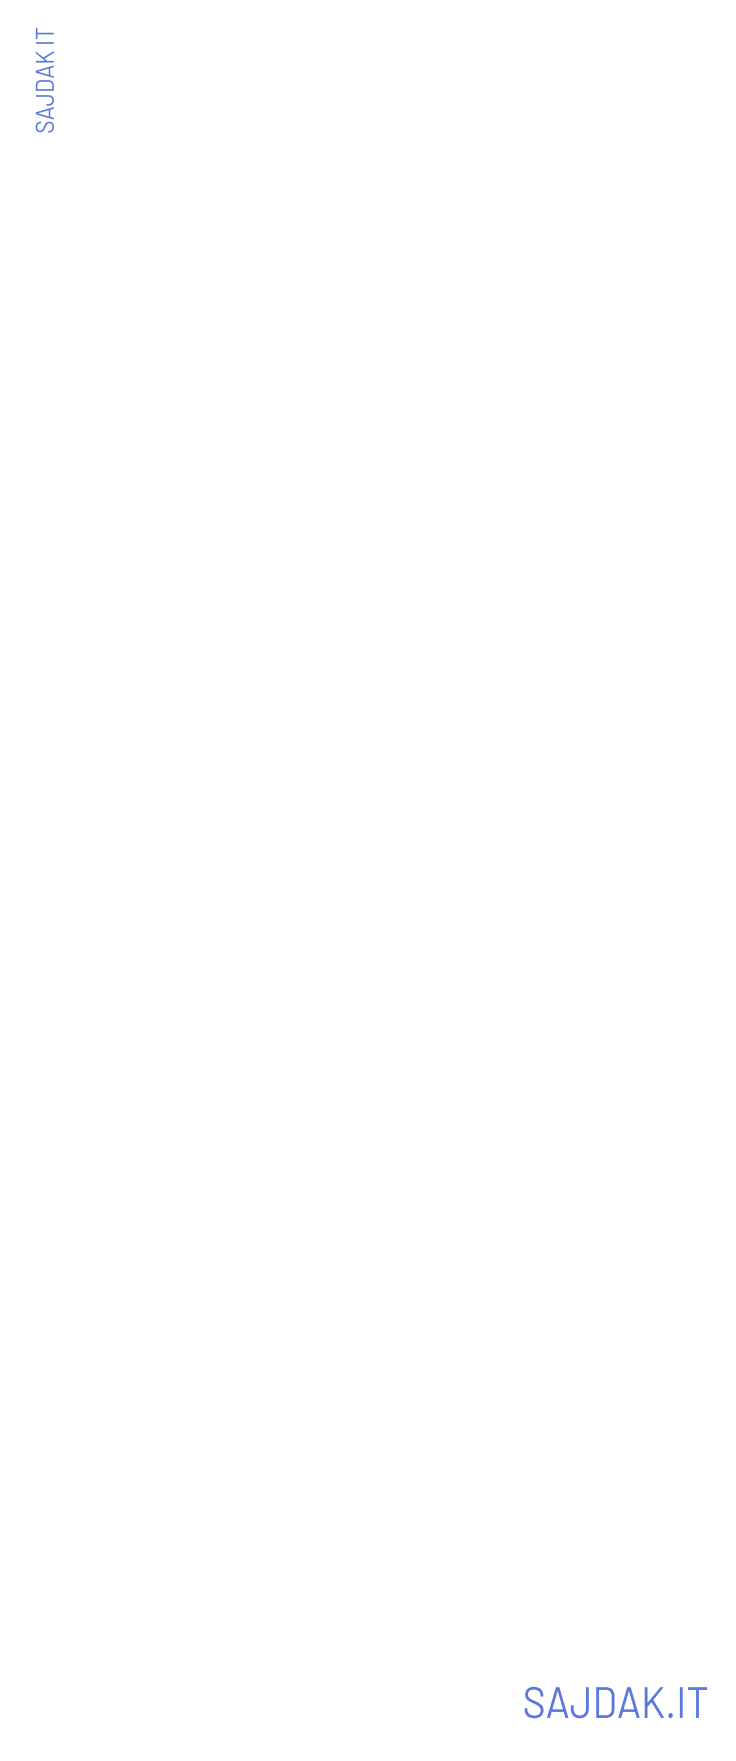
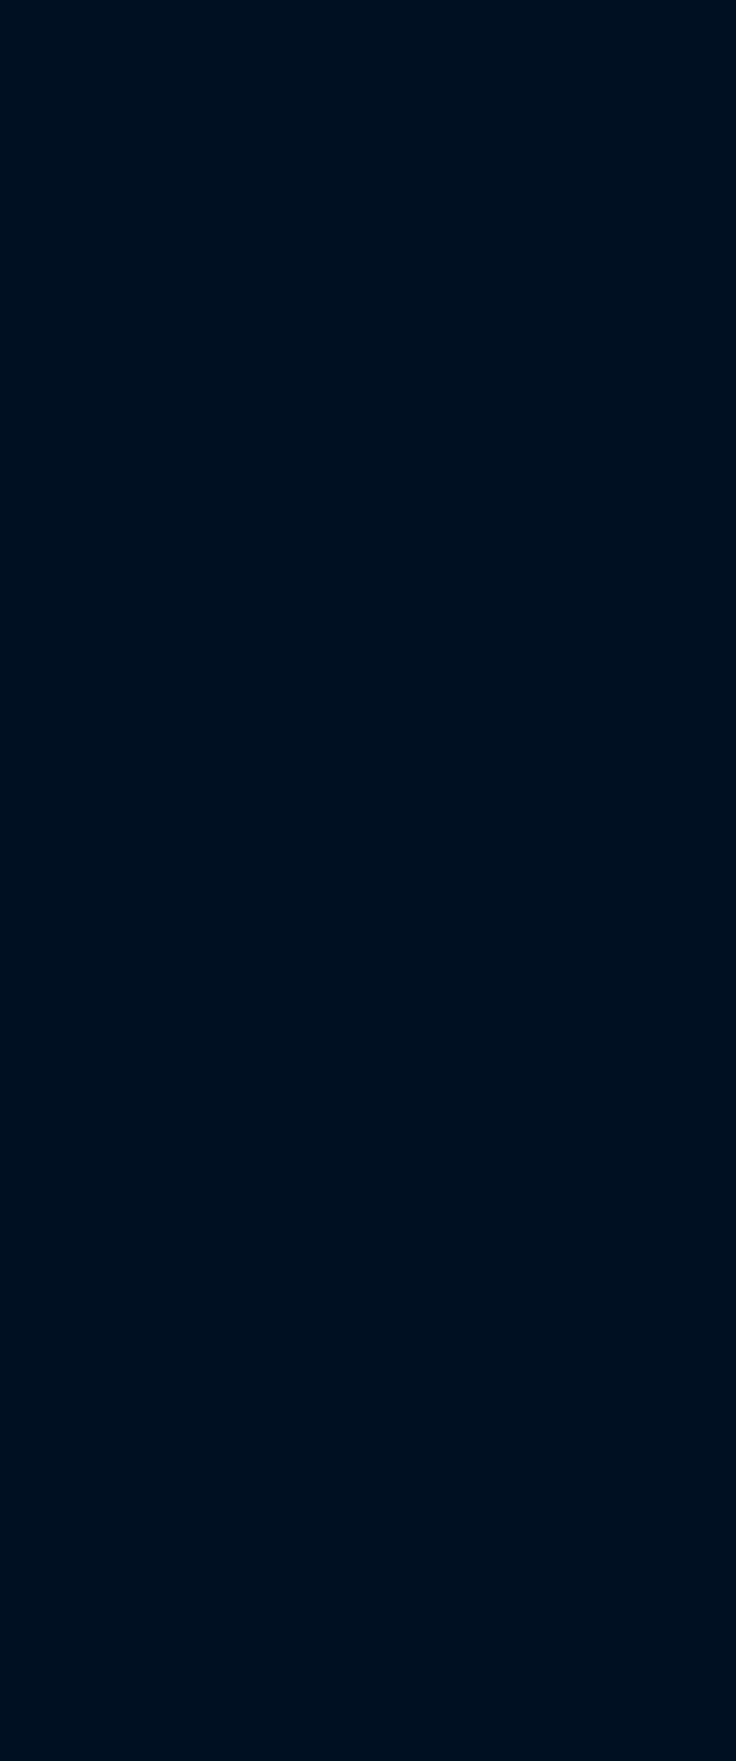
text: SAJDAK IT (44, 80) -> none
text: SAJDAK.IT (615, 1702) -> none

